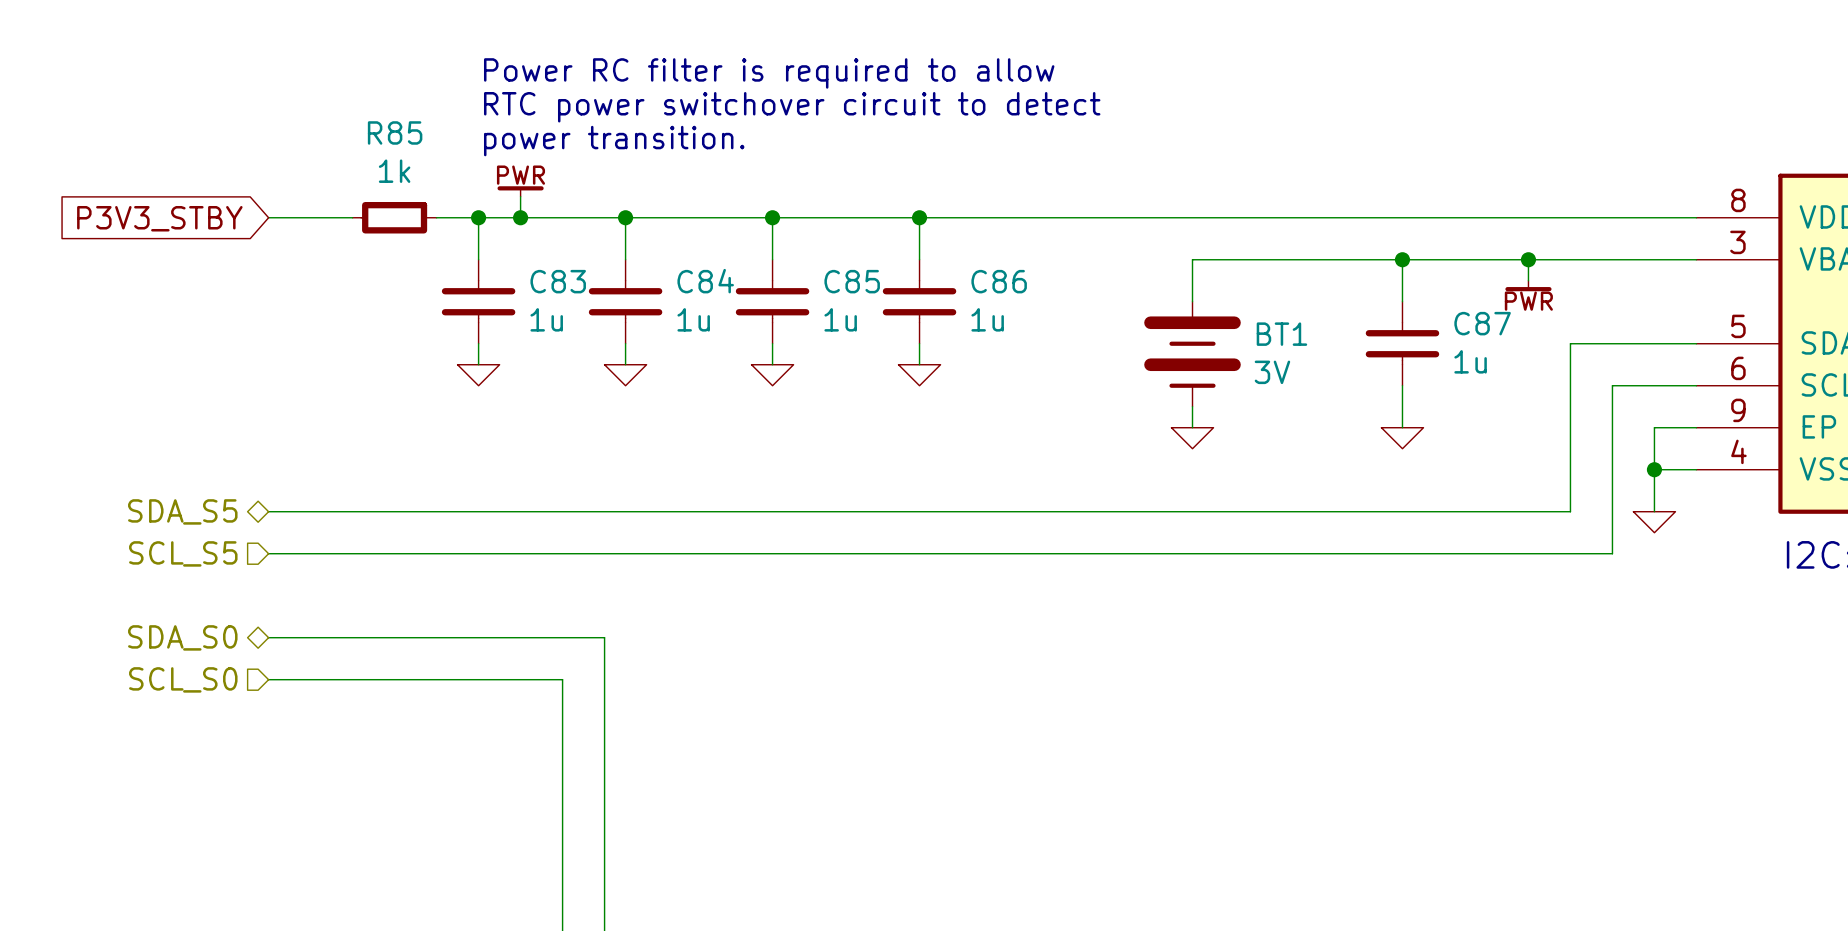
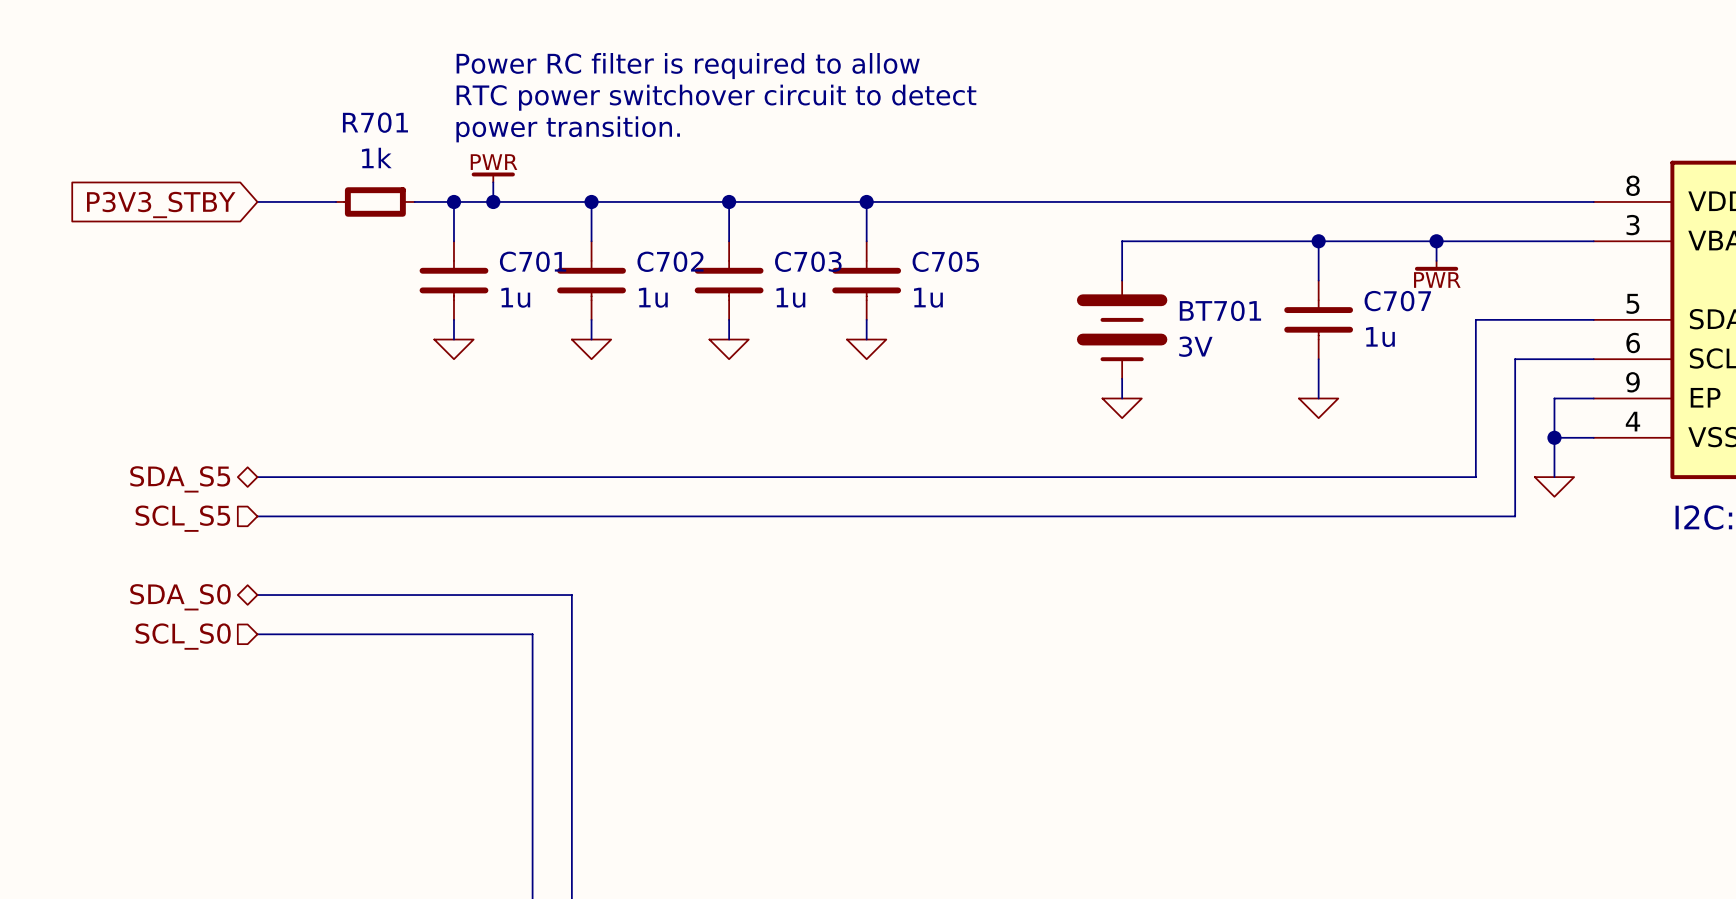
R85 name: R85 (395, 132) -> R701 (375, 122)
C83 name: C83 (558, 281) -> C701 (533, 261)
C84 name: C84 (705, 281) -> C702 (670, 261)
C85 name: C85 (852, 281) -> C703 (808, 261)
C86 name: C86 (999, 281) -> C705 (945, 261)
C87 name: C87 (1482, 323) -> C707 (1397, 301)
BT1 name: BT1 (1281, 334) -> BT701 (1220, 310)

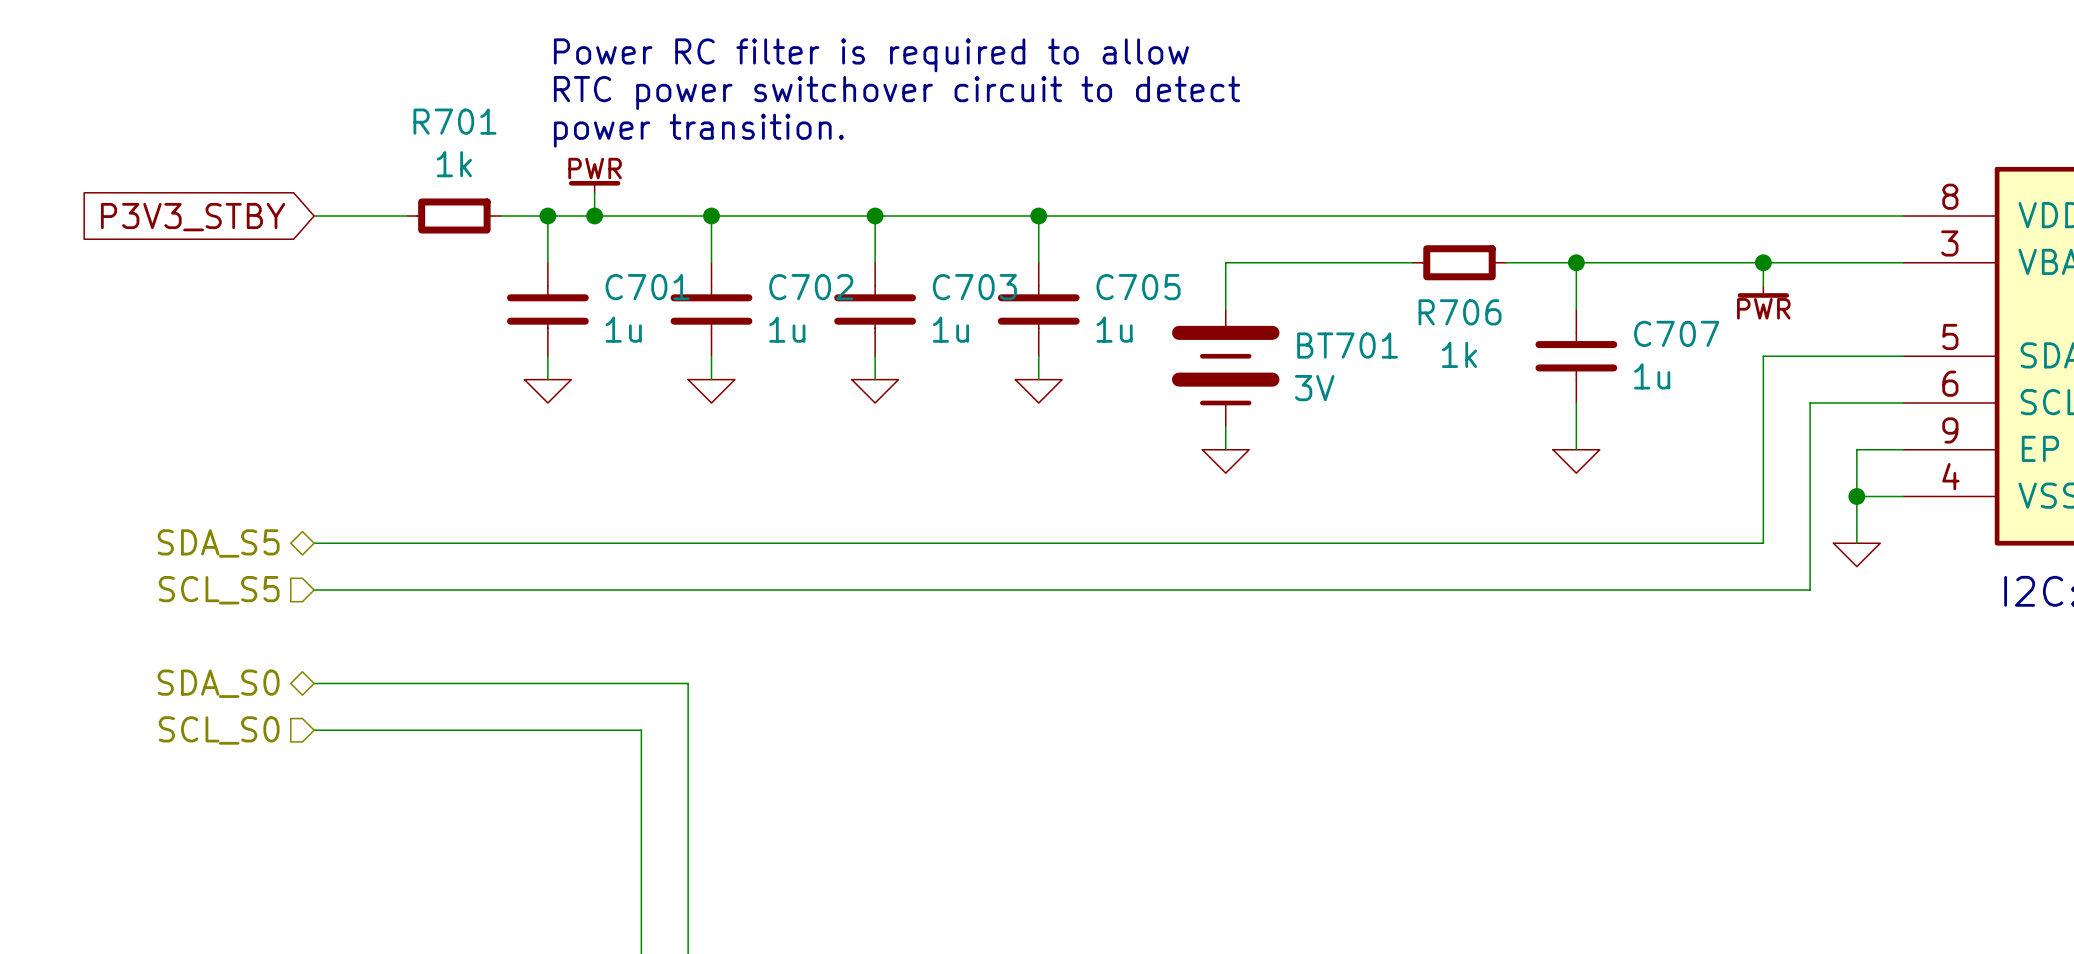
wire: (1122, 241) (1122, 280) -> (1342, 262) (1225, 262) (1225, 309)
wire: (1181, 241) (1259, 241) -> none
R706: none -> 1k (1459, 262)
wire: (1436, 241) (1436, 260) -> (1763, 262) (1763, 286)
junction position: (1436, 241) -> (1763, 262)
power symbol position: (1436, 265) -> (1763, 291)
BT701 position: (1122, 329) -> (1225, 367)
wire: (1122, 378) (1122, 398) -> (1225, 426) (1225, 449)
power symbol position: (1122, 408) -> (1225, 461)

